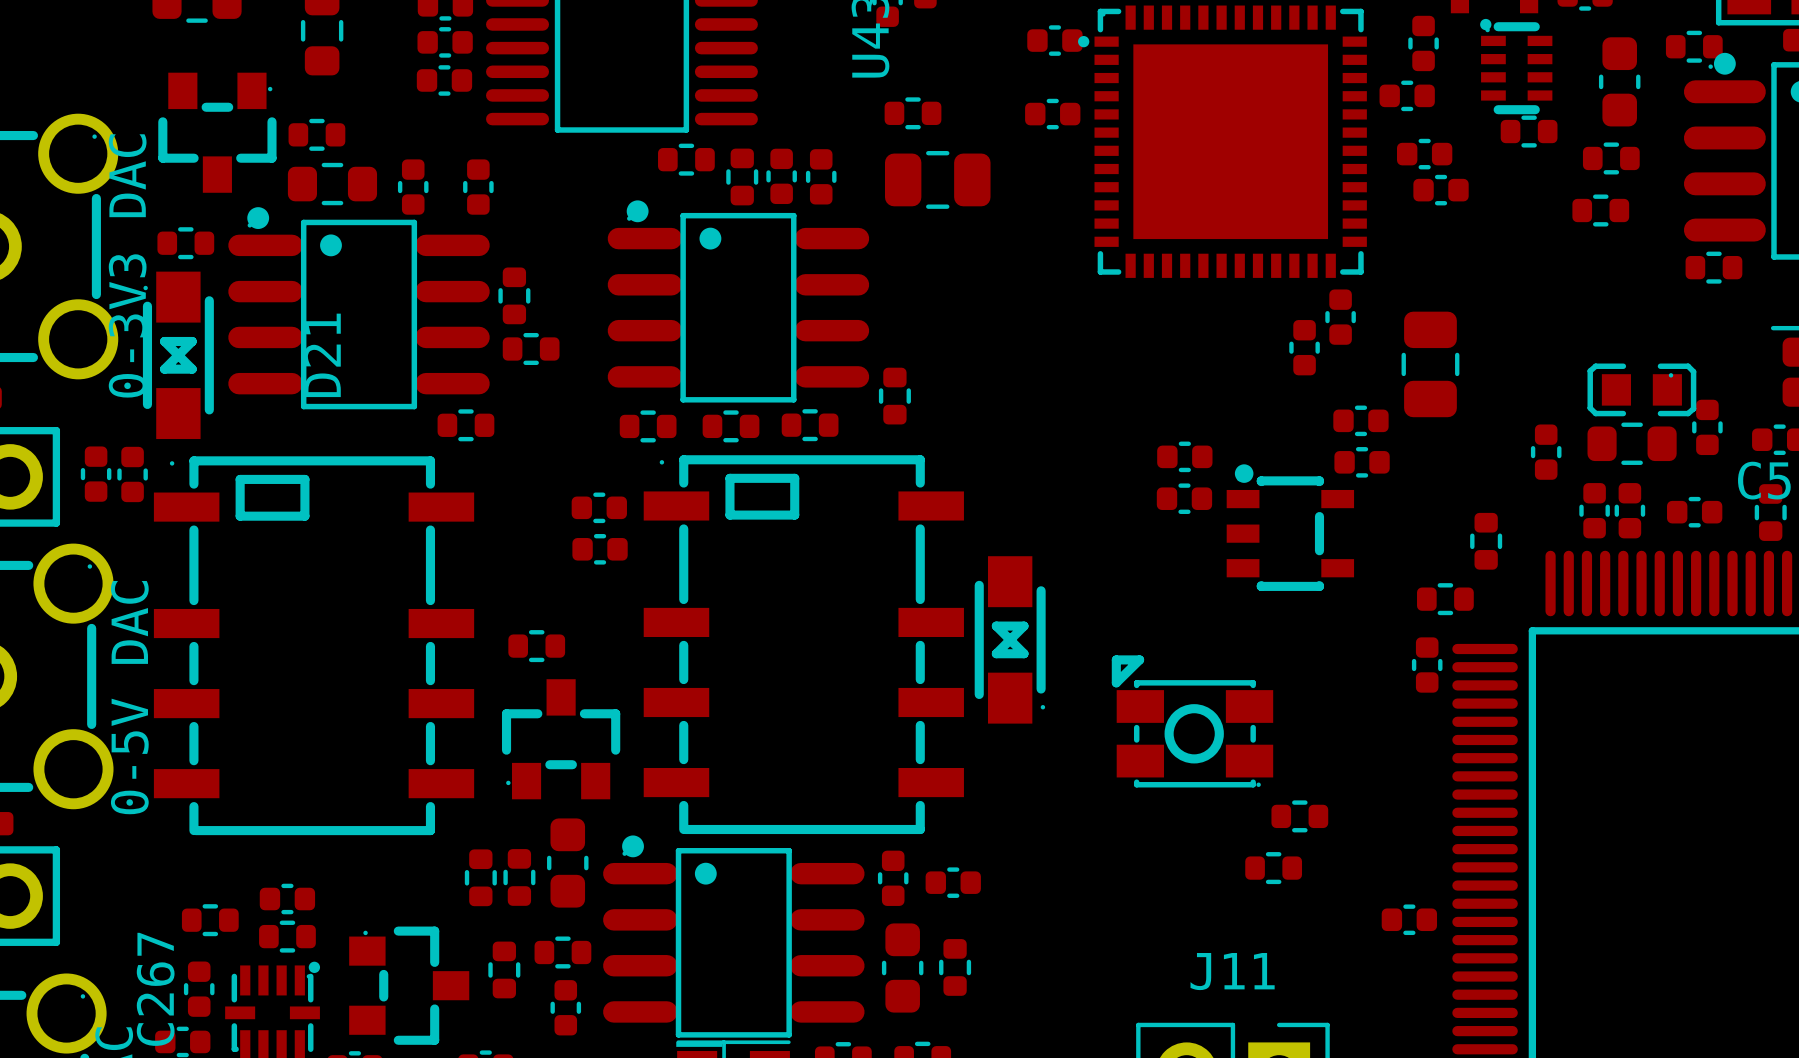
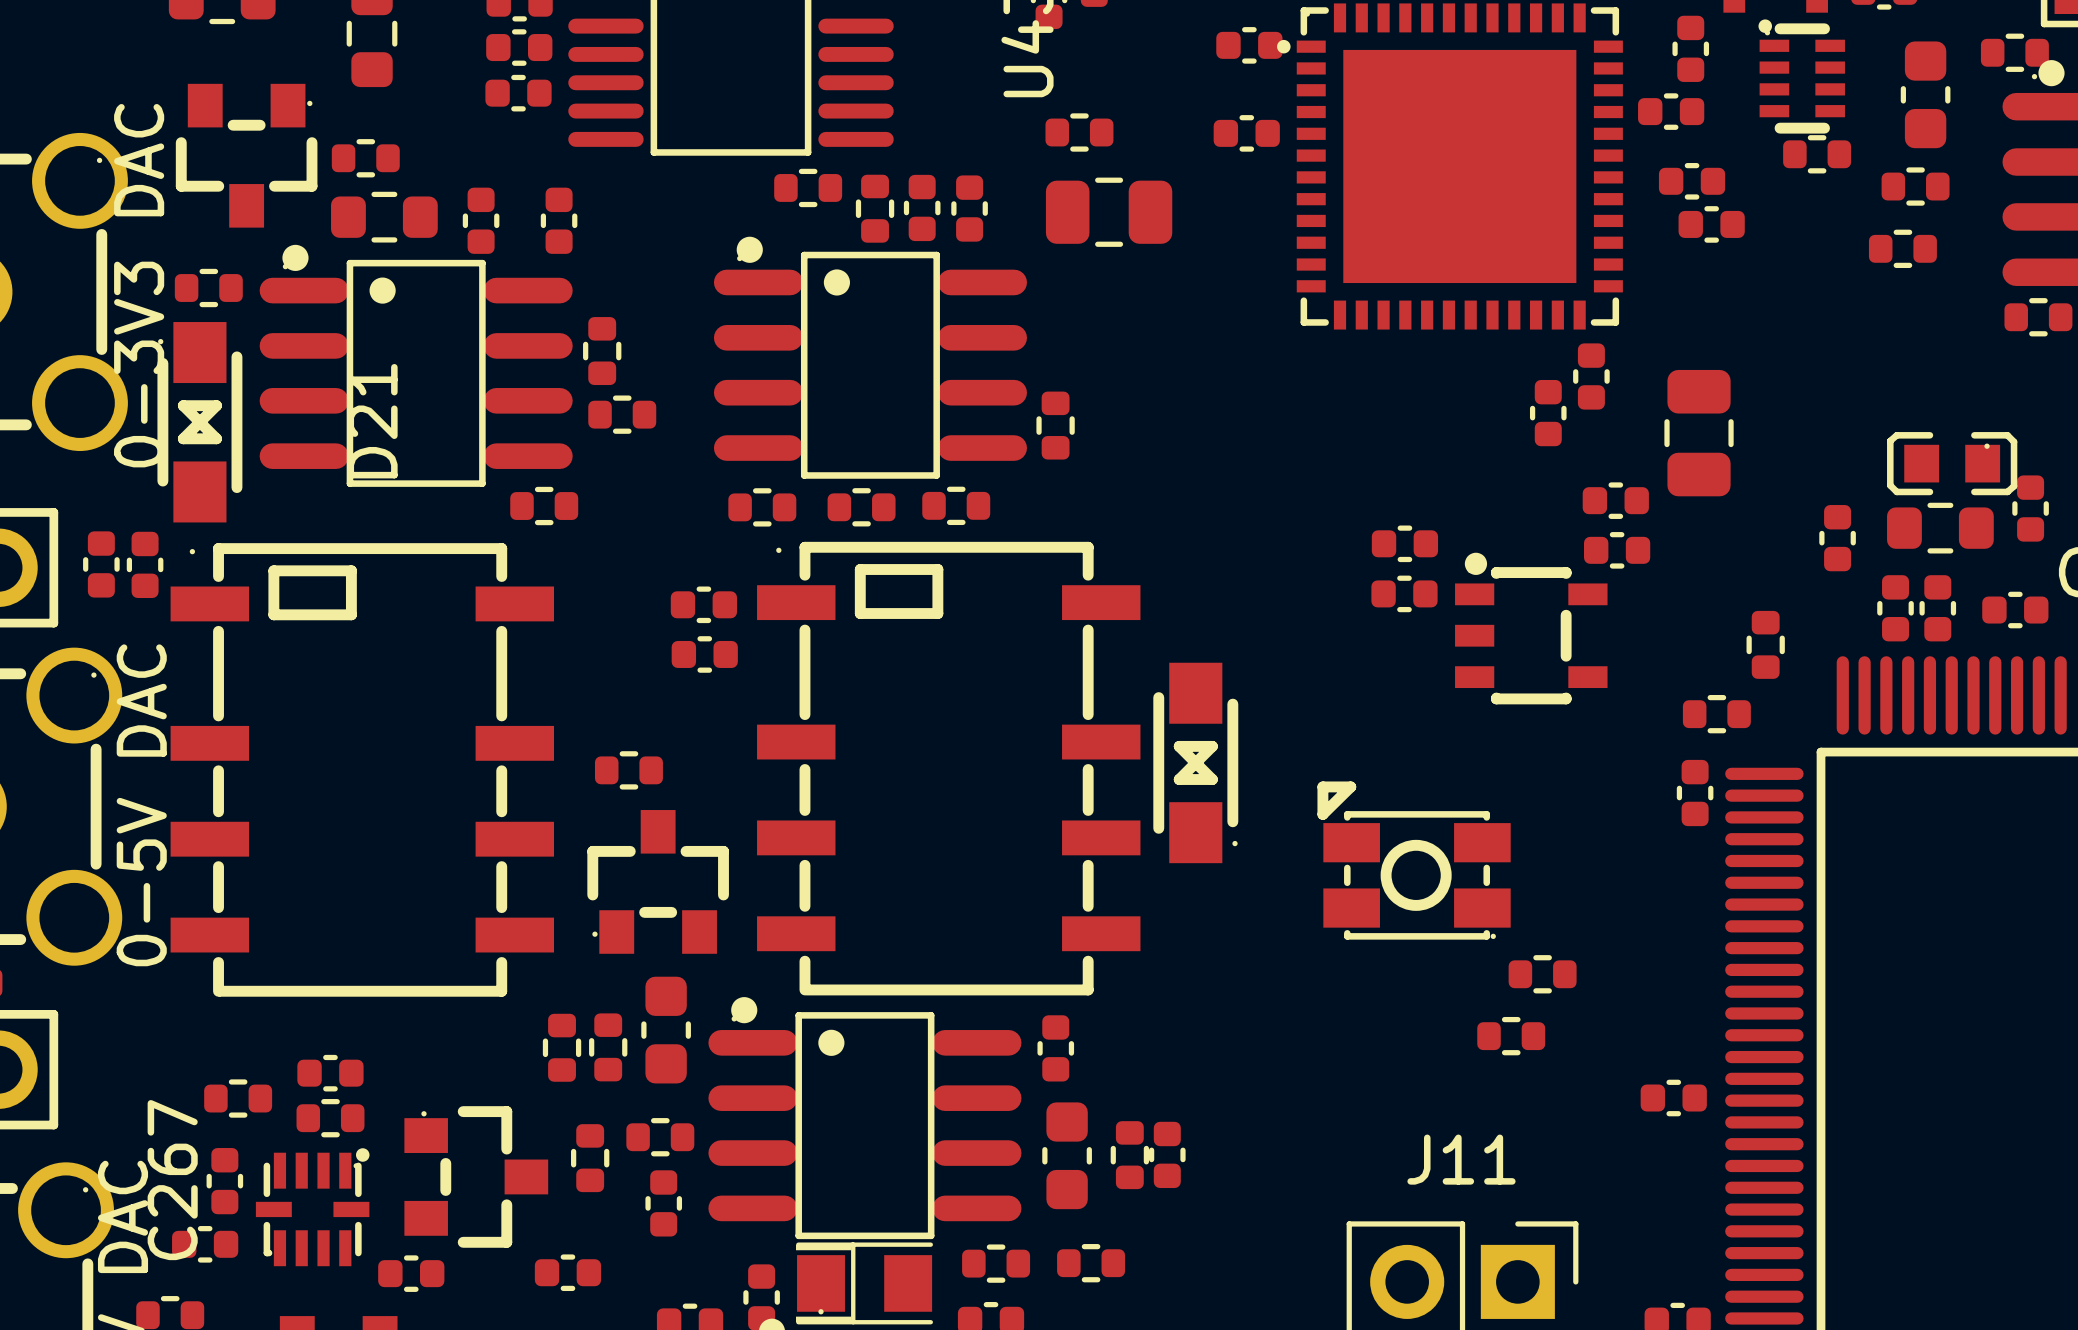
part position: (894, 396) -> (1055, 425)
part rotation: 0° (953, 882) -> 90° clockwise (1167, 1154)
part position: (953, 882) -> (1167, 1154)

